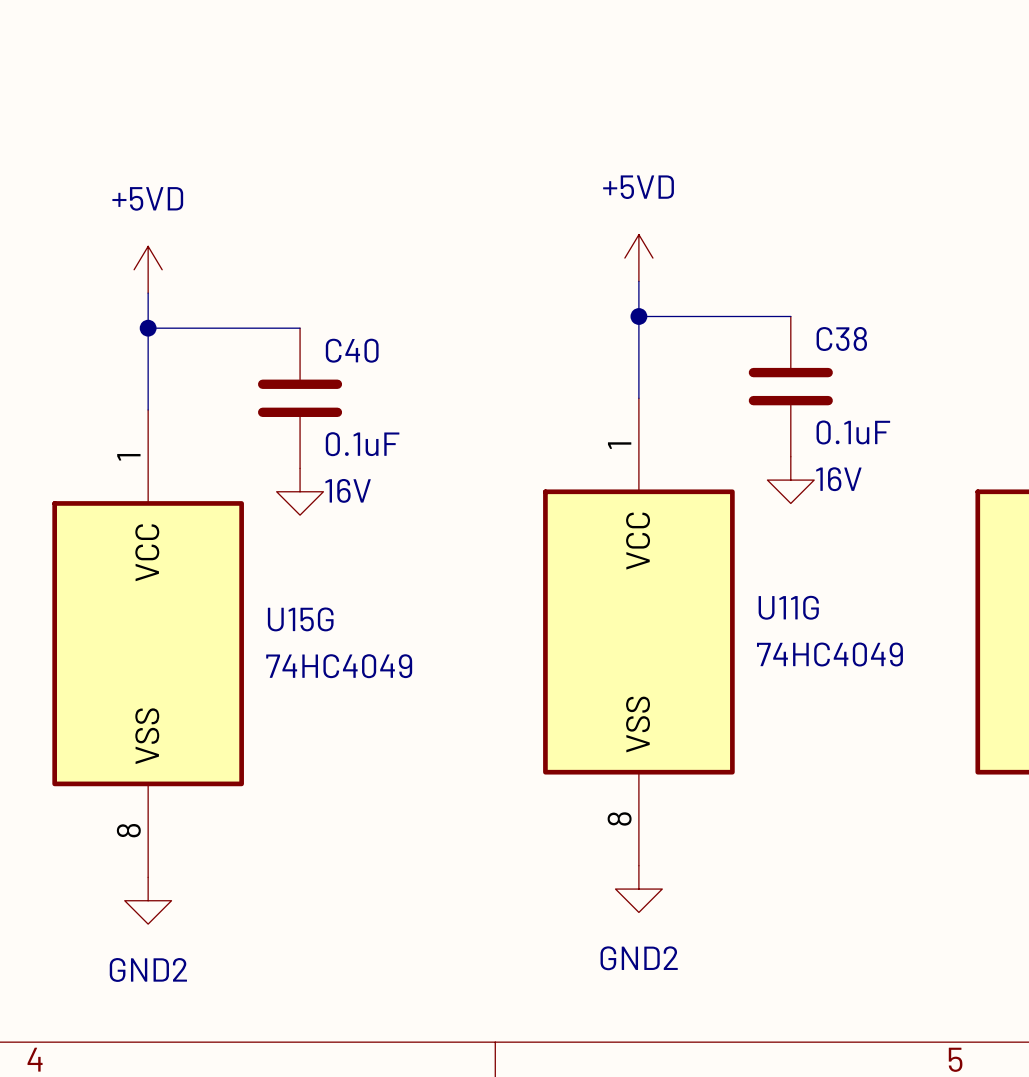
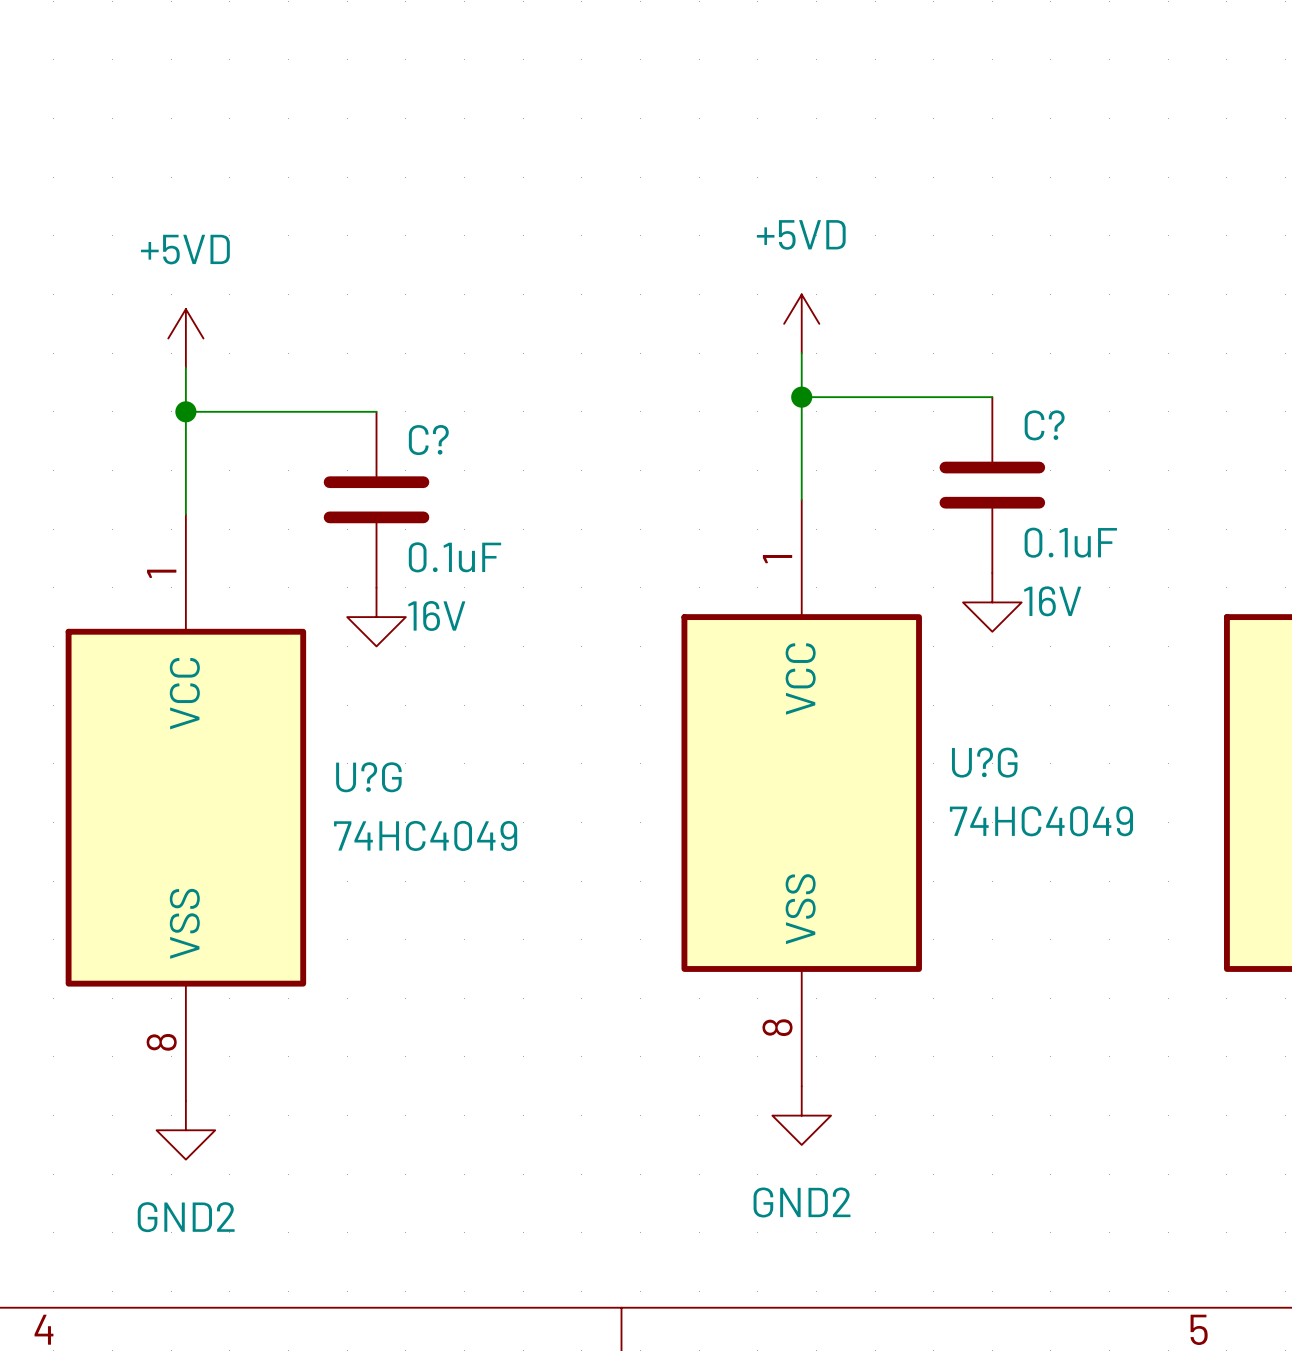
C38 name: C38 (841, 338) -> C? (1044, 425)
C40 name: C40 (352, 350) -> C? (428, 440)
U11G name: U11G (788, 607) -> U?G (984, 762)
U15G name: U15G (300, 619) -> U?G (368, 777)

